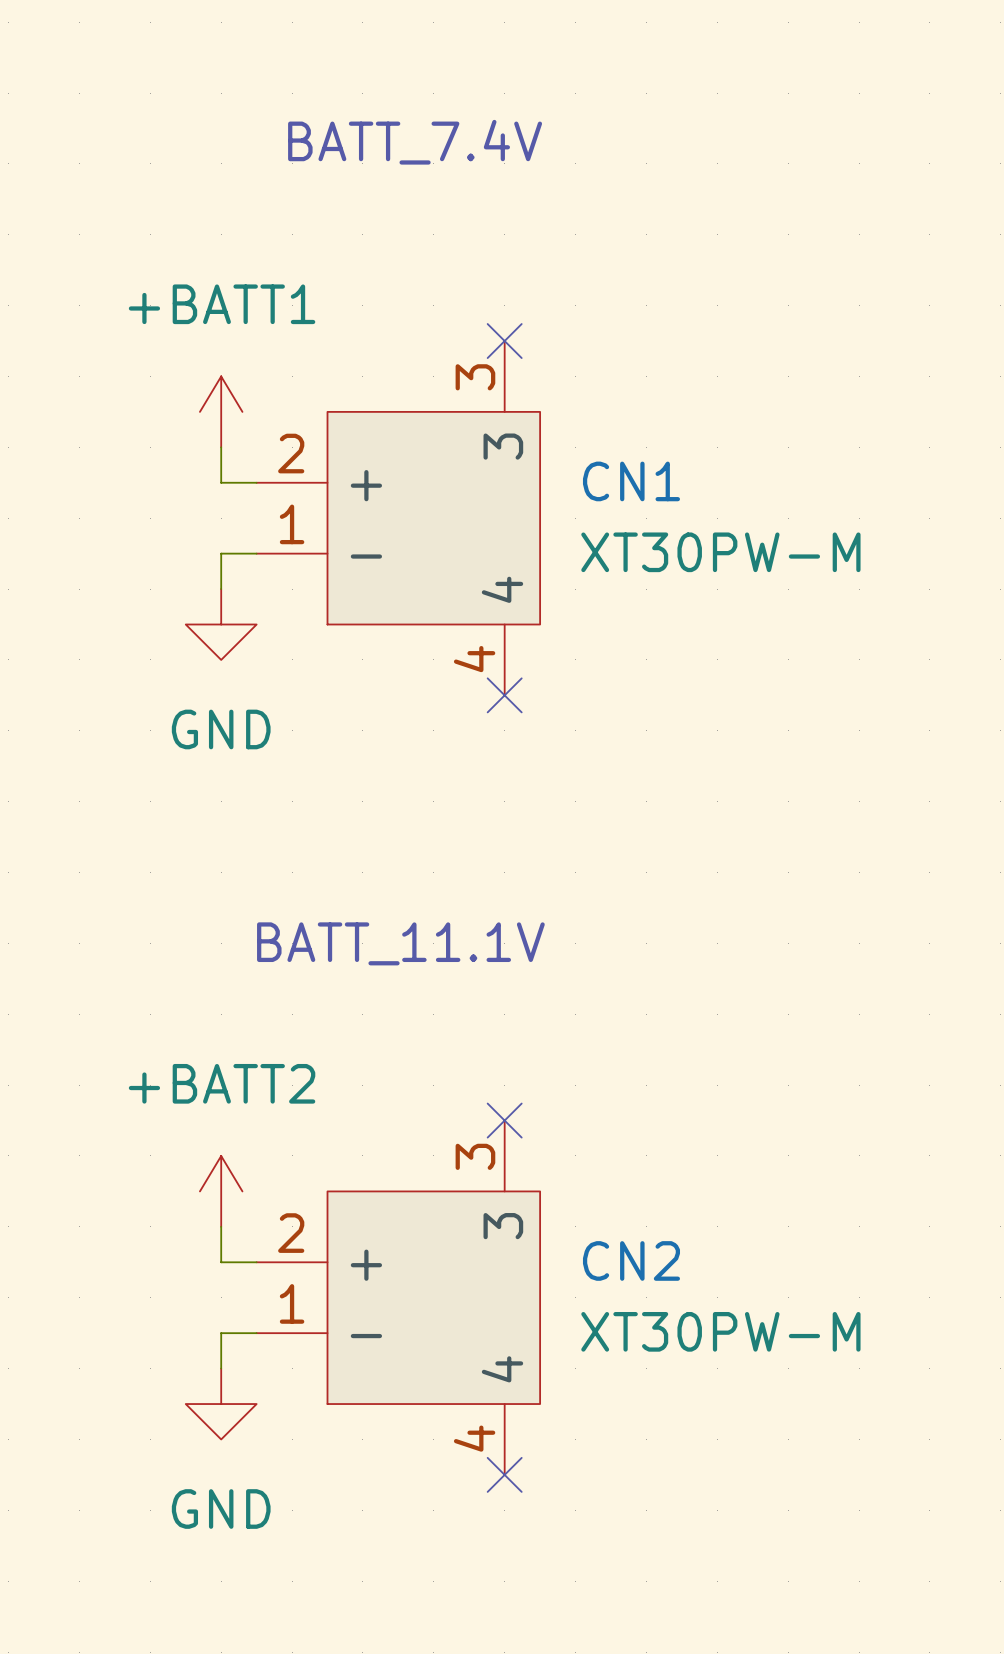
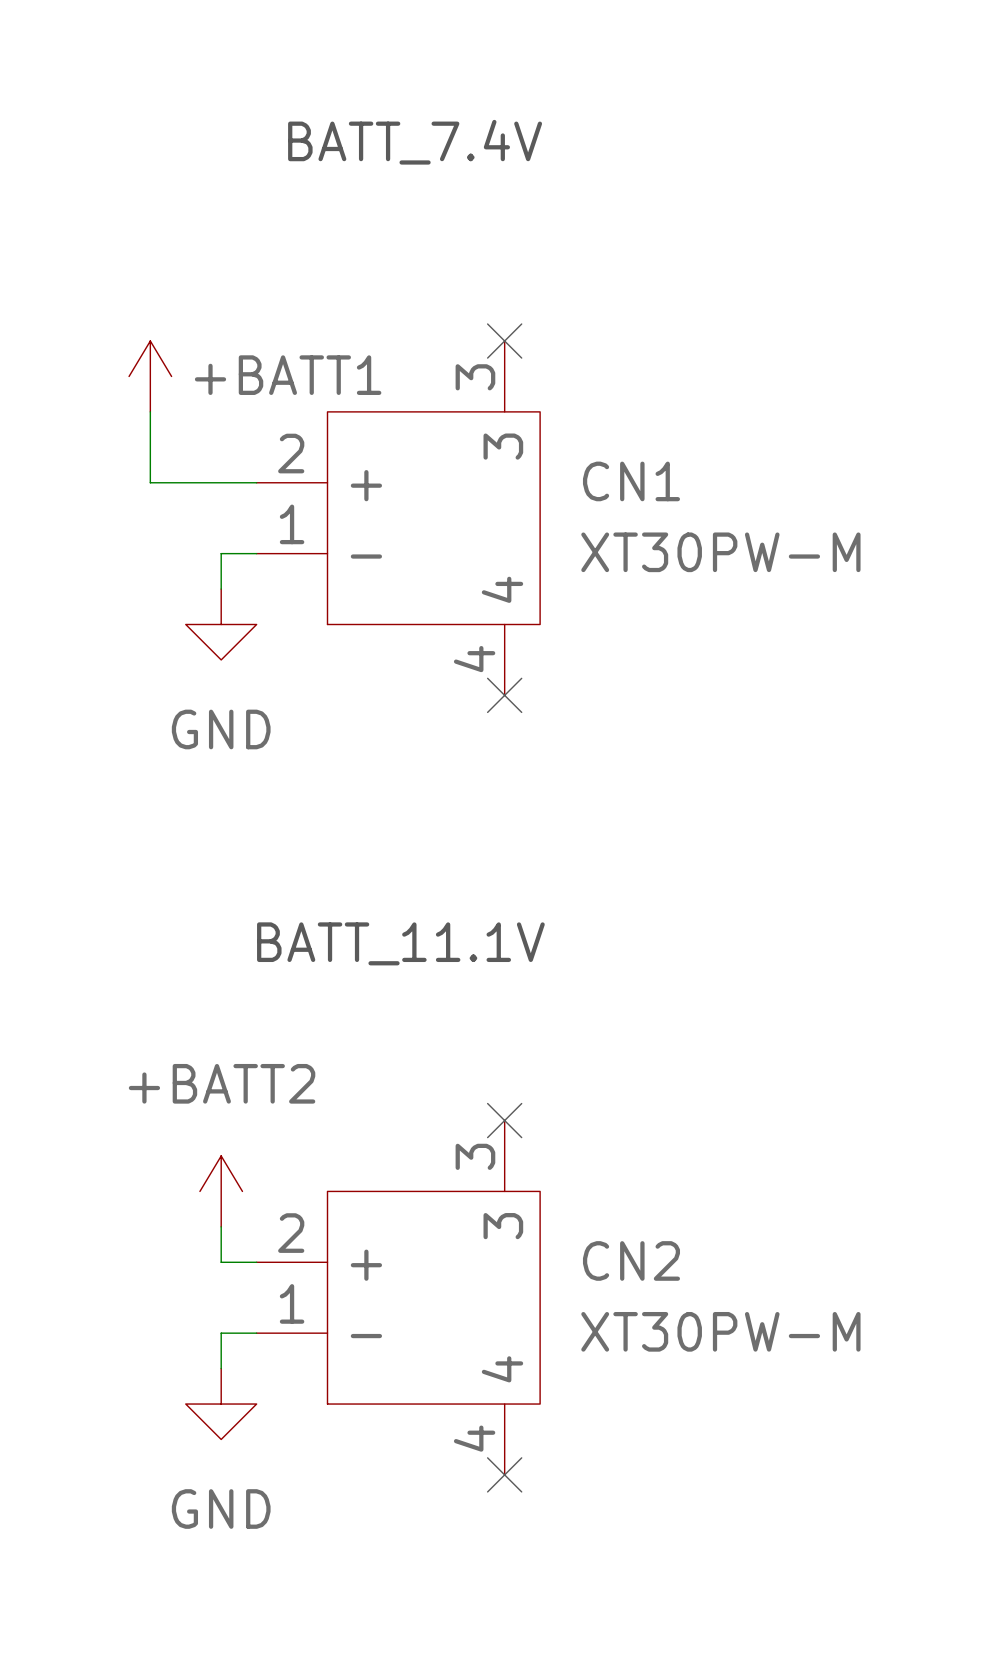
power symbol text position: +BATT1 (222, 304) -> +BATT1 (288, 375)
power symbol position: +BATT1 (221, 411) -> +BATT1 (150, 376)
wire: (221, 447) (221, 482) -> (150, 411) (150, 482) (221, 482)

